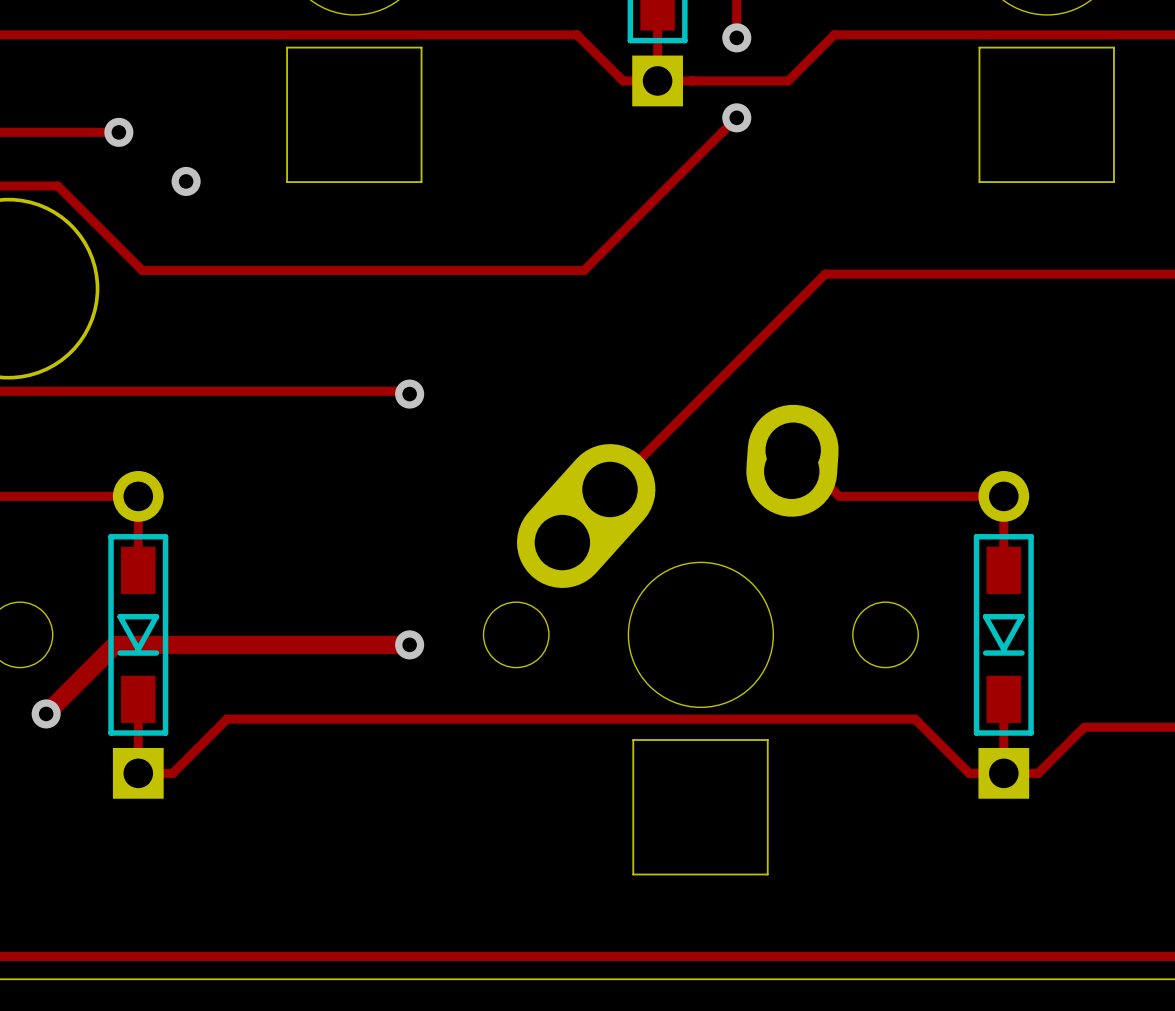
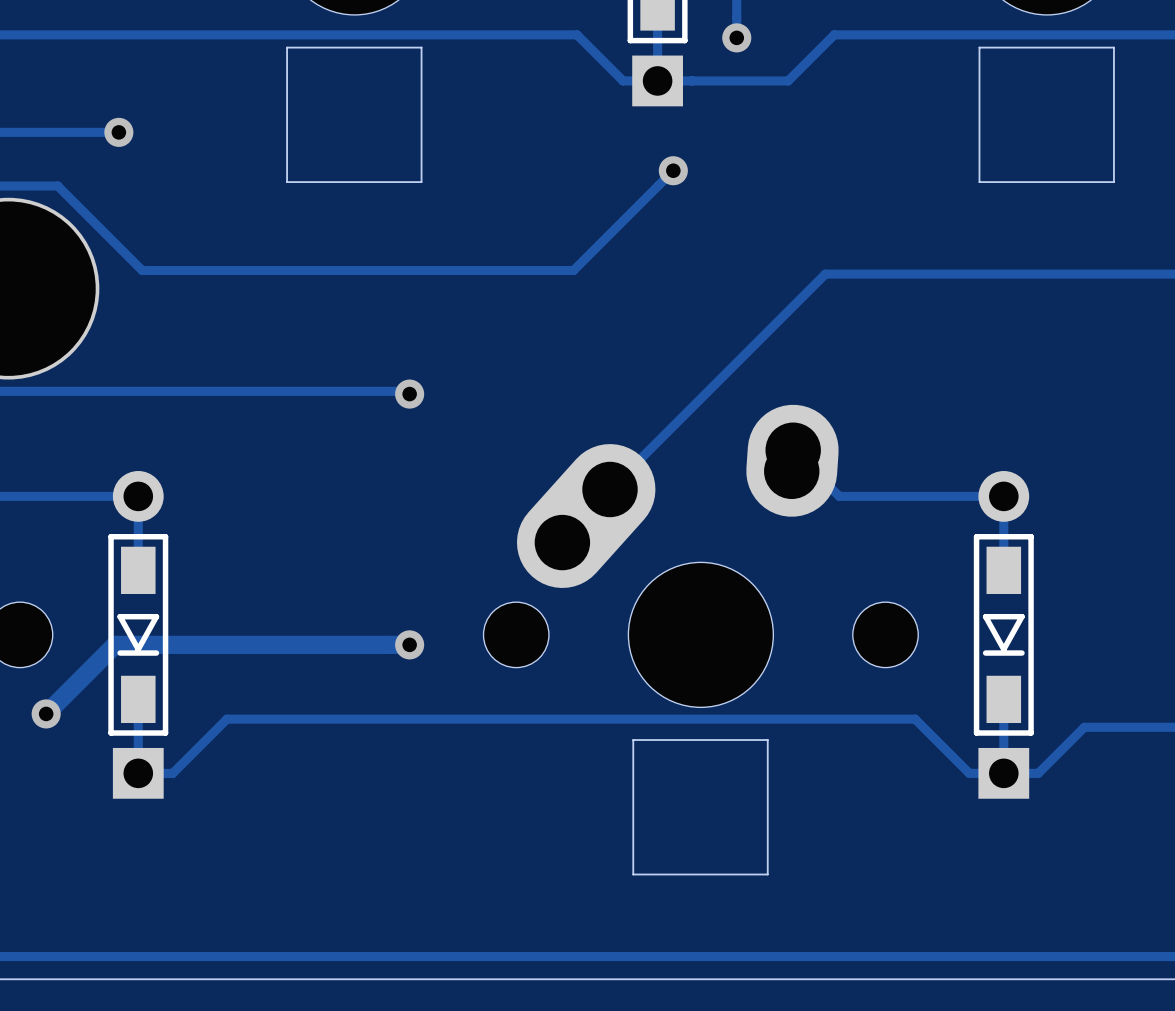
track: (736, 117) (584, 270) (573, 270) -> (673, 170) (573, 270)
via position: (736, 117) -> (673, 170)
via: (186, 181) -> none

